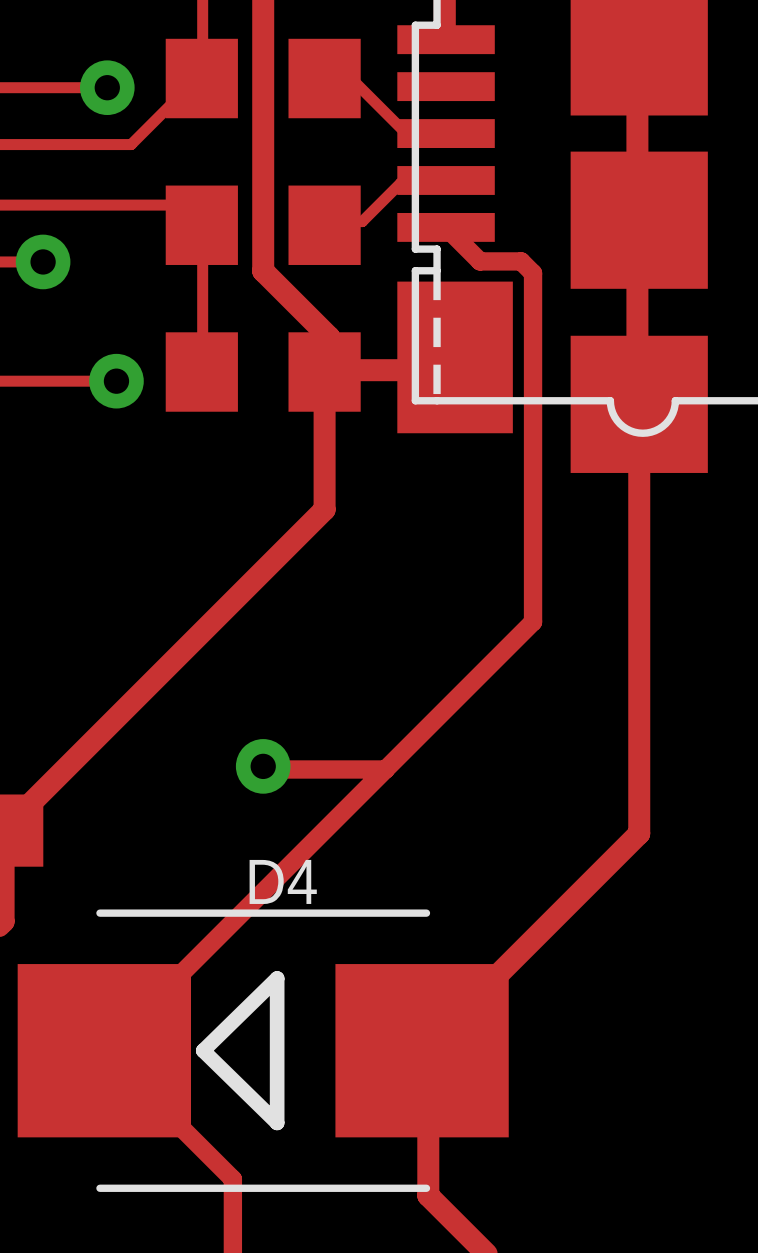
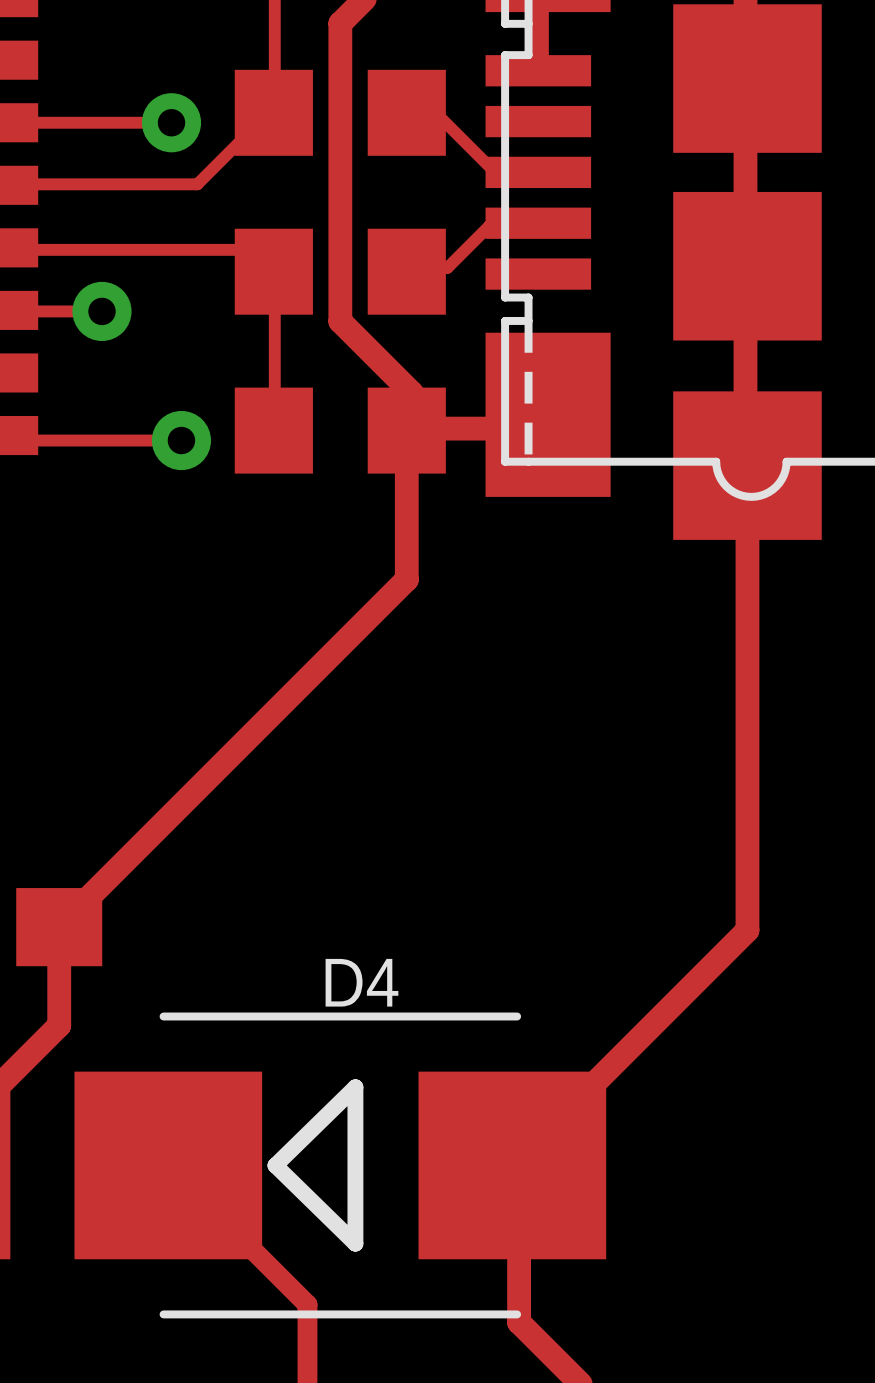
track: (446, 227) (480, 261) (521, 261) (533, 273) (533, 622) (104, 1050) -> none
track: (263, 766) (266, 769) (385, 769) -> none
via: (263, 766) -> none

